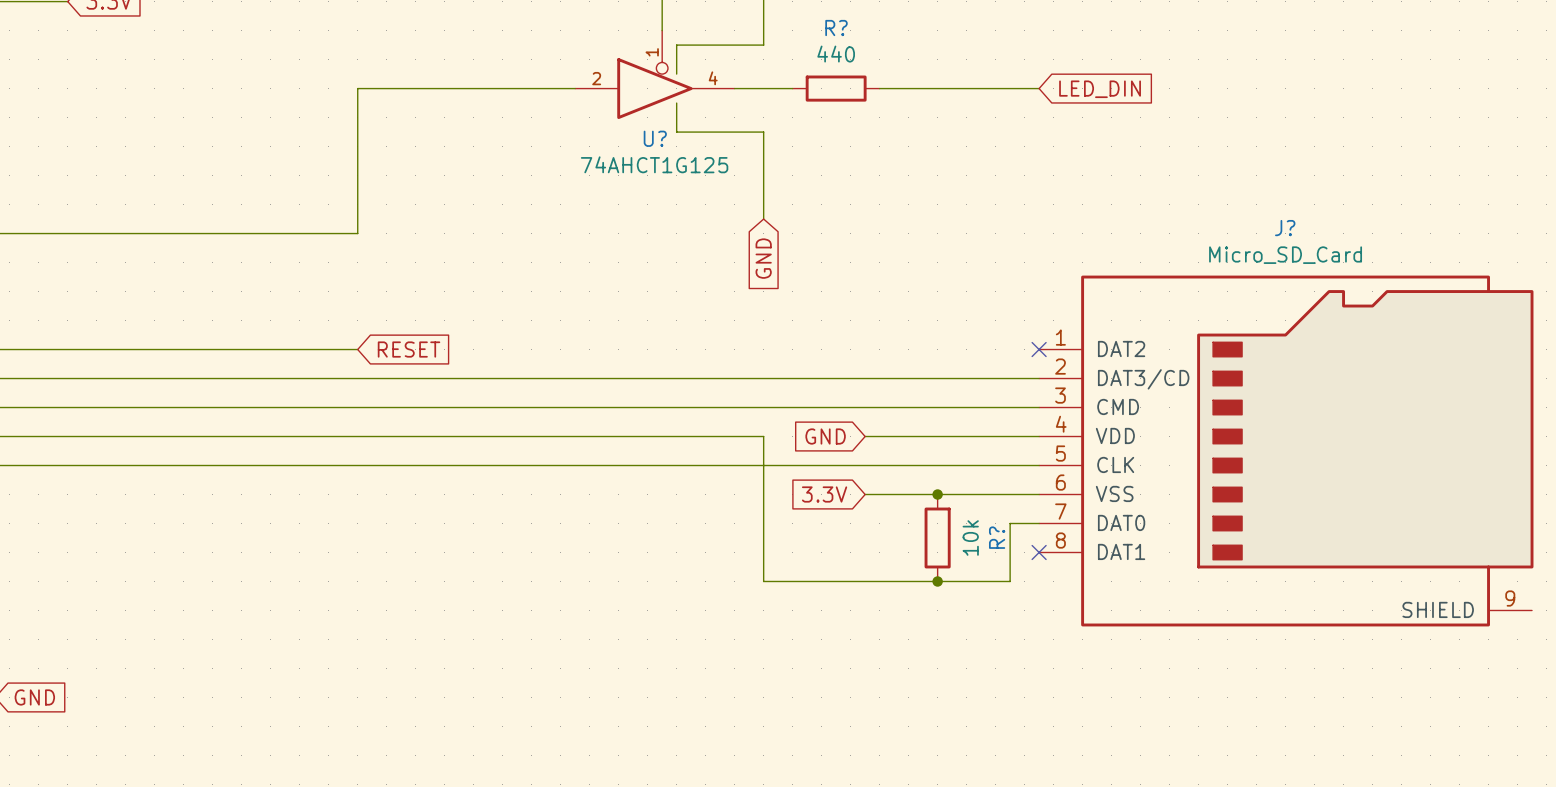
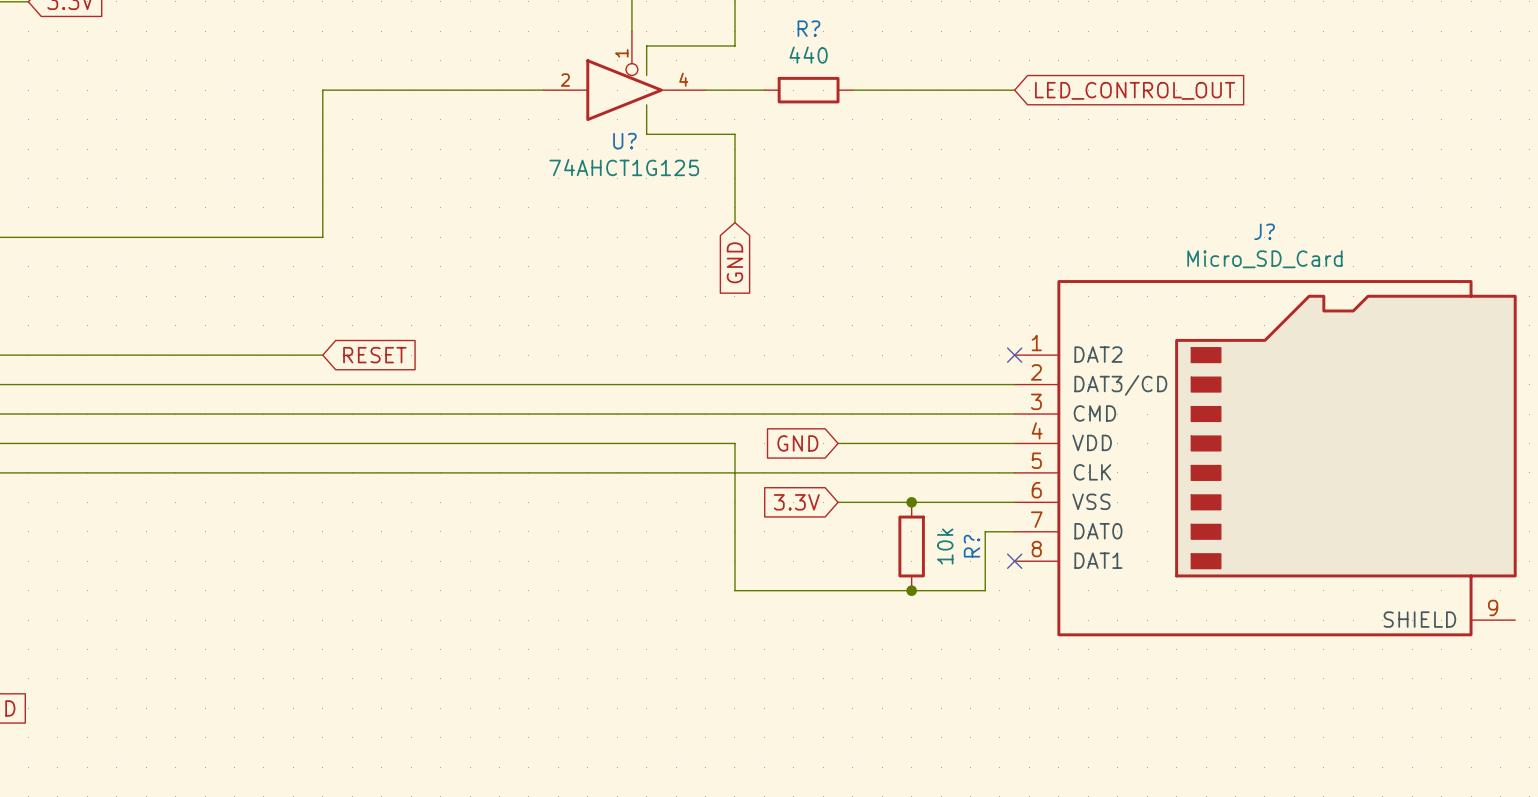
global label: LED_DIN (1100, 89) -> LED_CONTROL_OUT (1135, 90)

